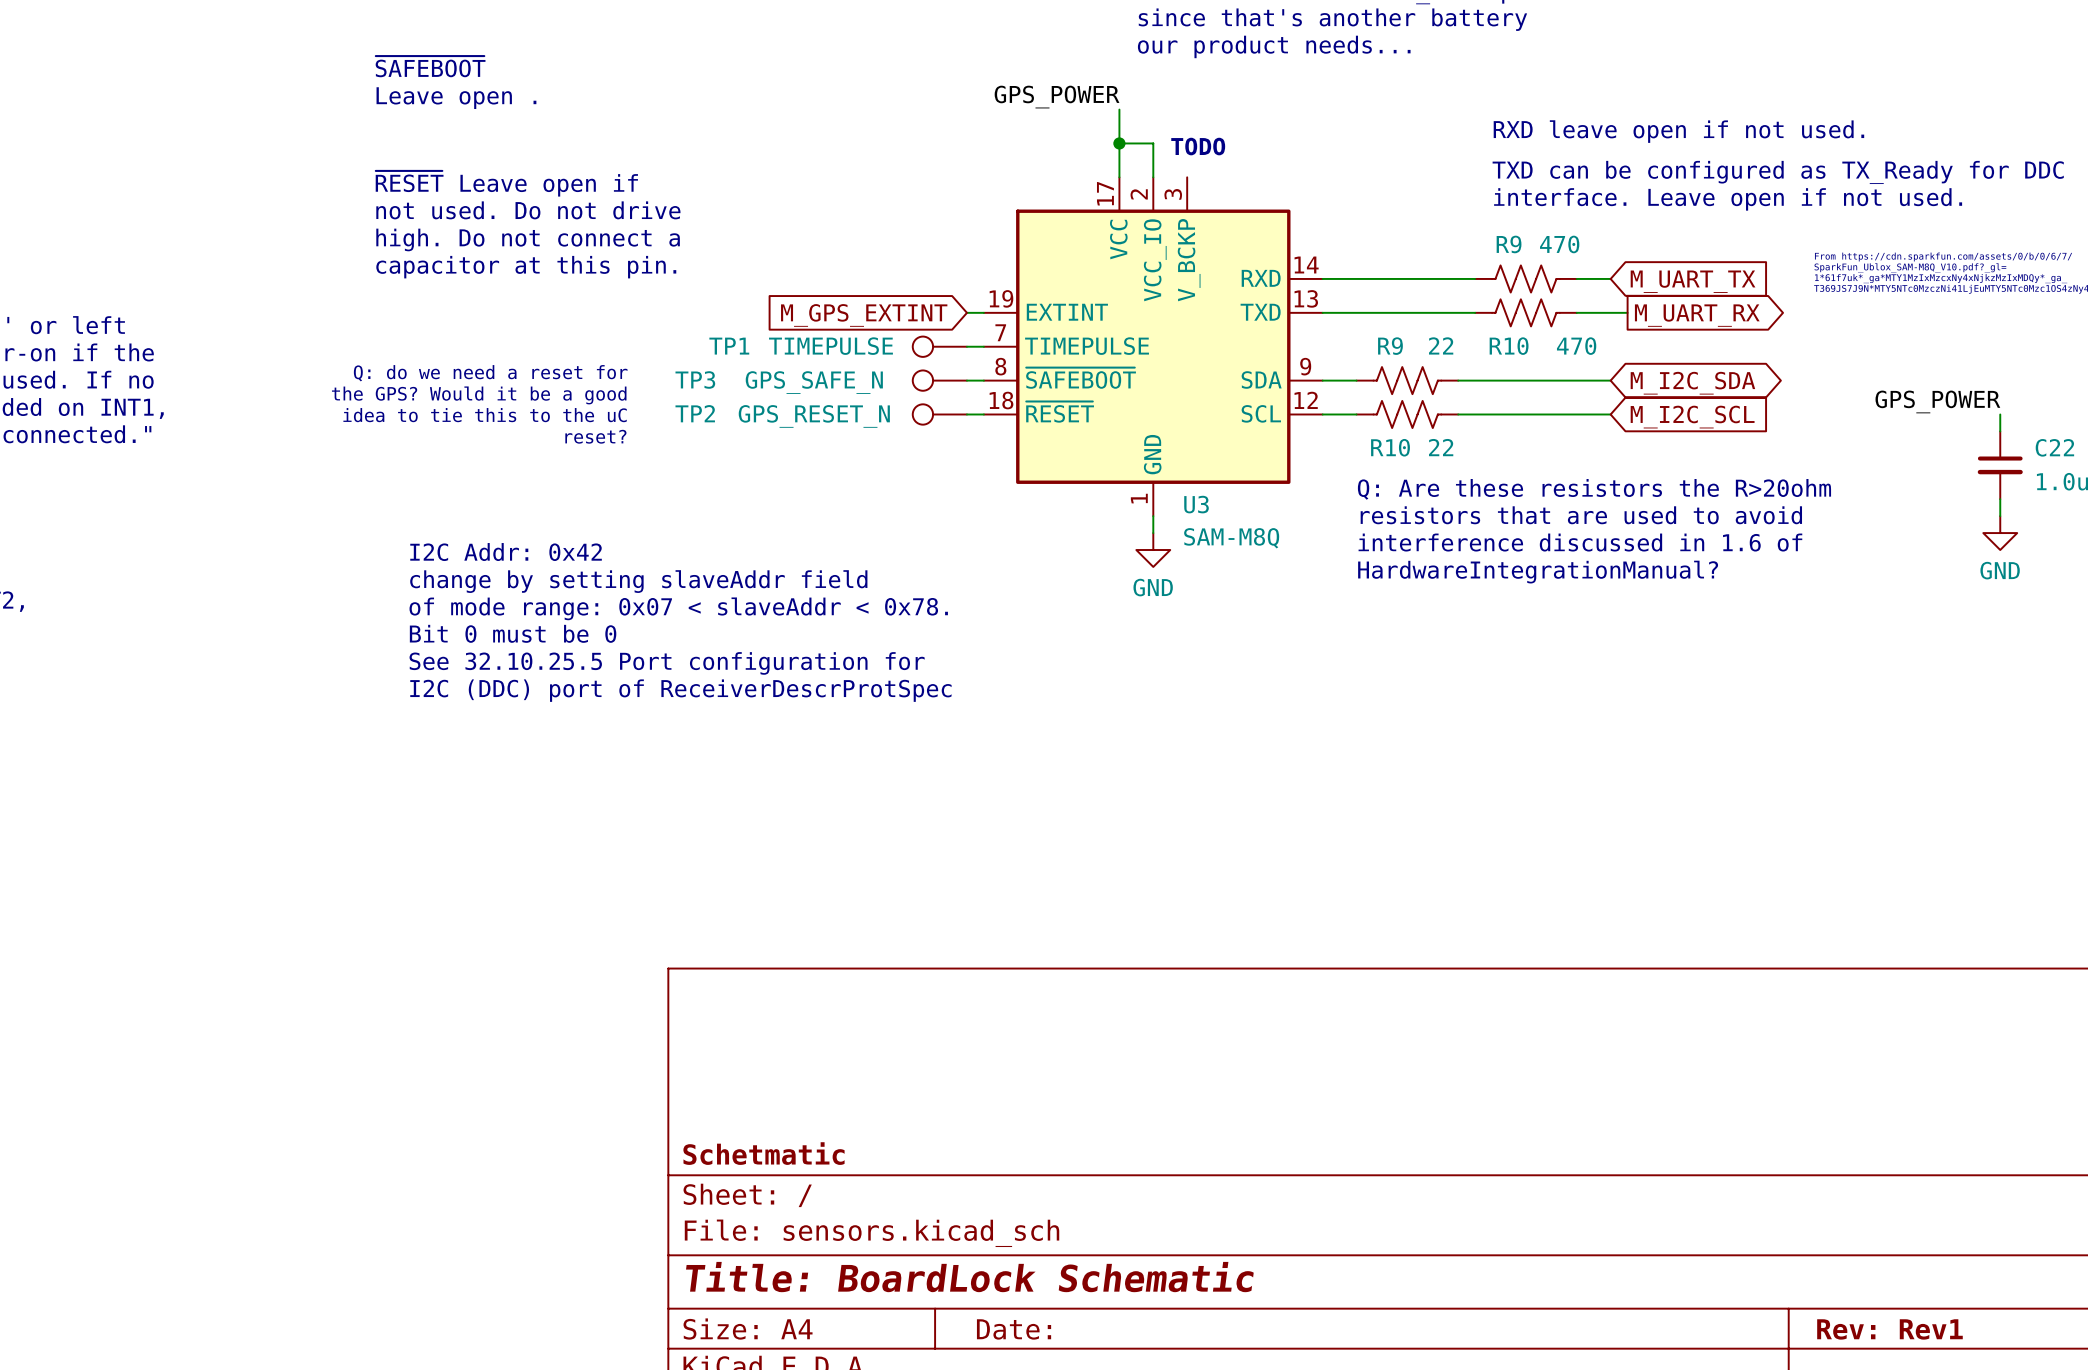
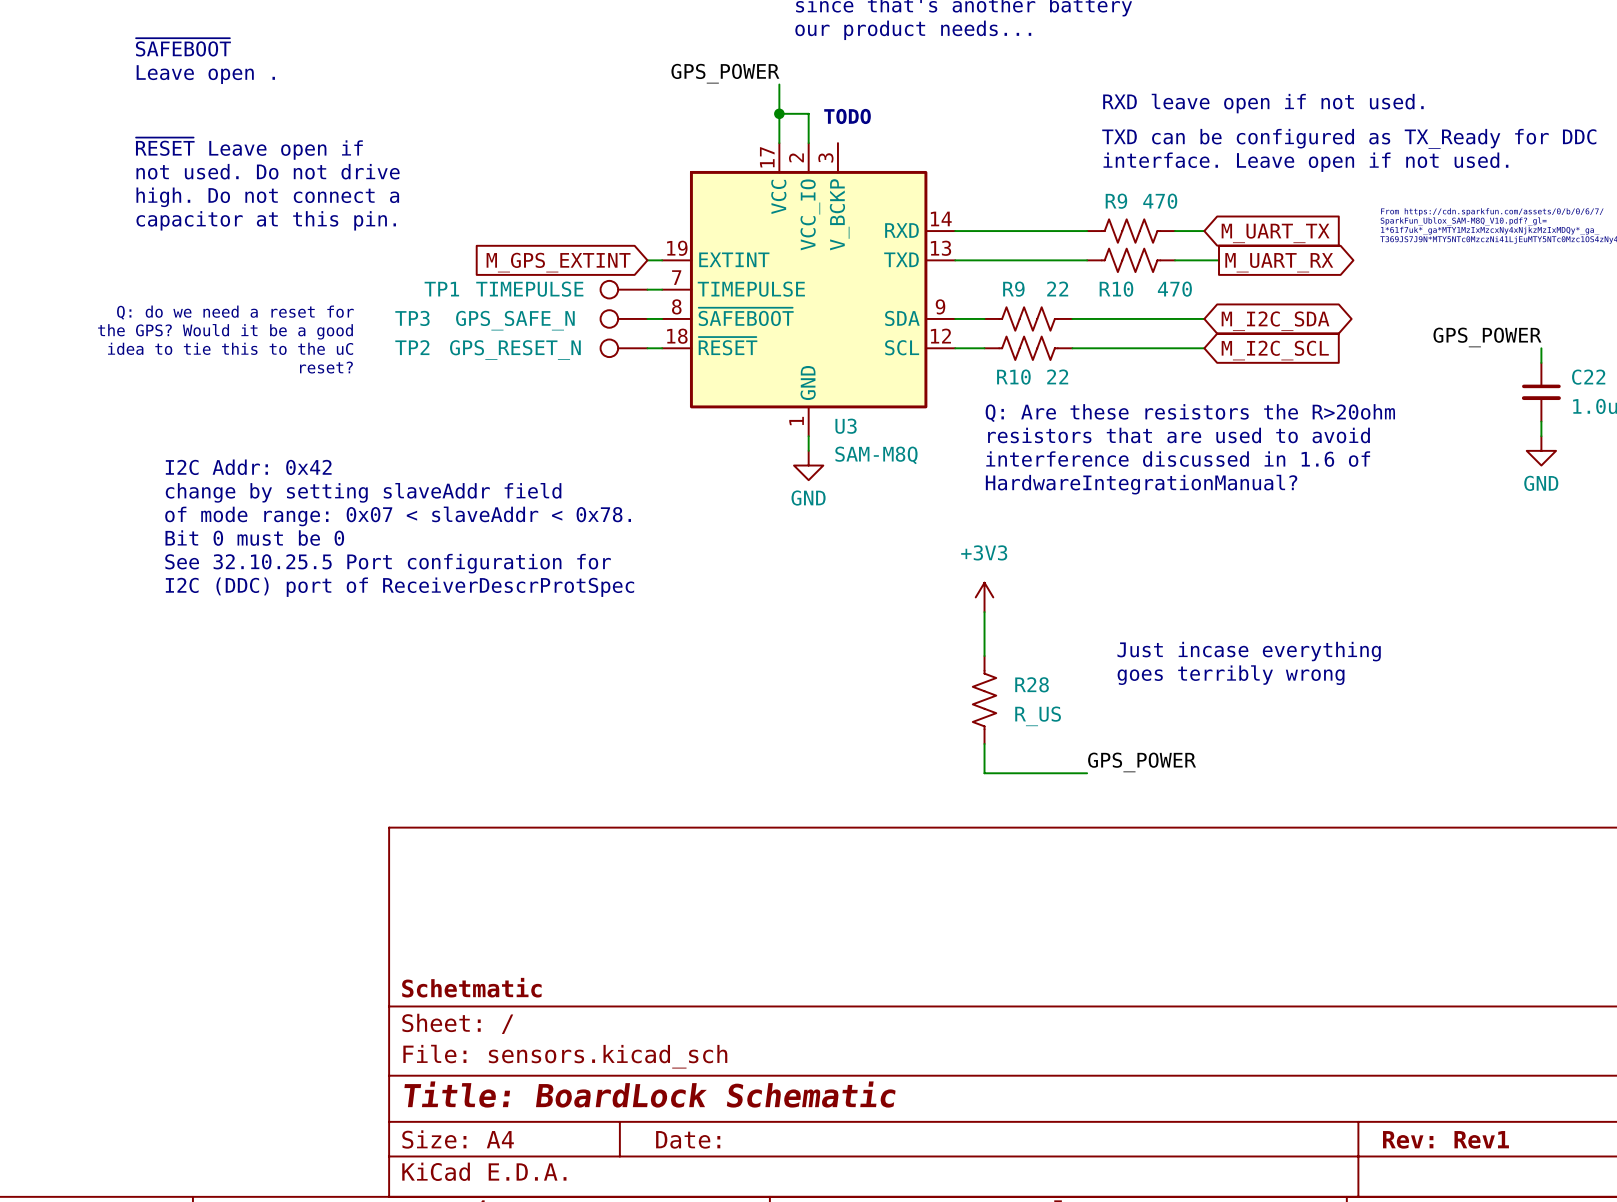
power symbol: none -> +3V3 (984, 597)
wire: none -> (984, 612) (984, 656)
text: none -> Just incase everything (1249, 651)
text: none -> goes terribly wrong (1231, 675)
R28: none -> R_US (984, 699)
wire: none -> (984, 743) (984, 773) (1087, 773)
label: none -> GPS_POWER (1142, 762)

